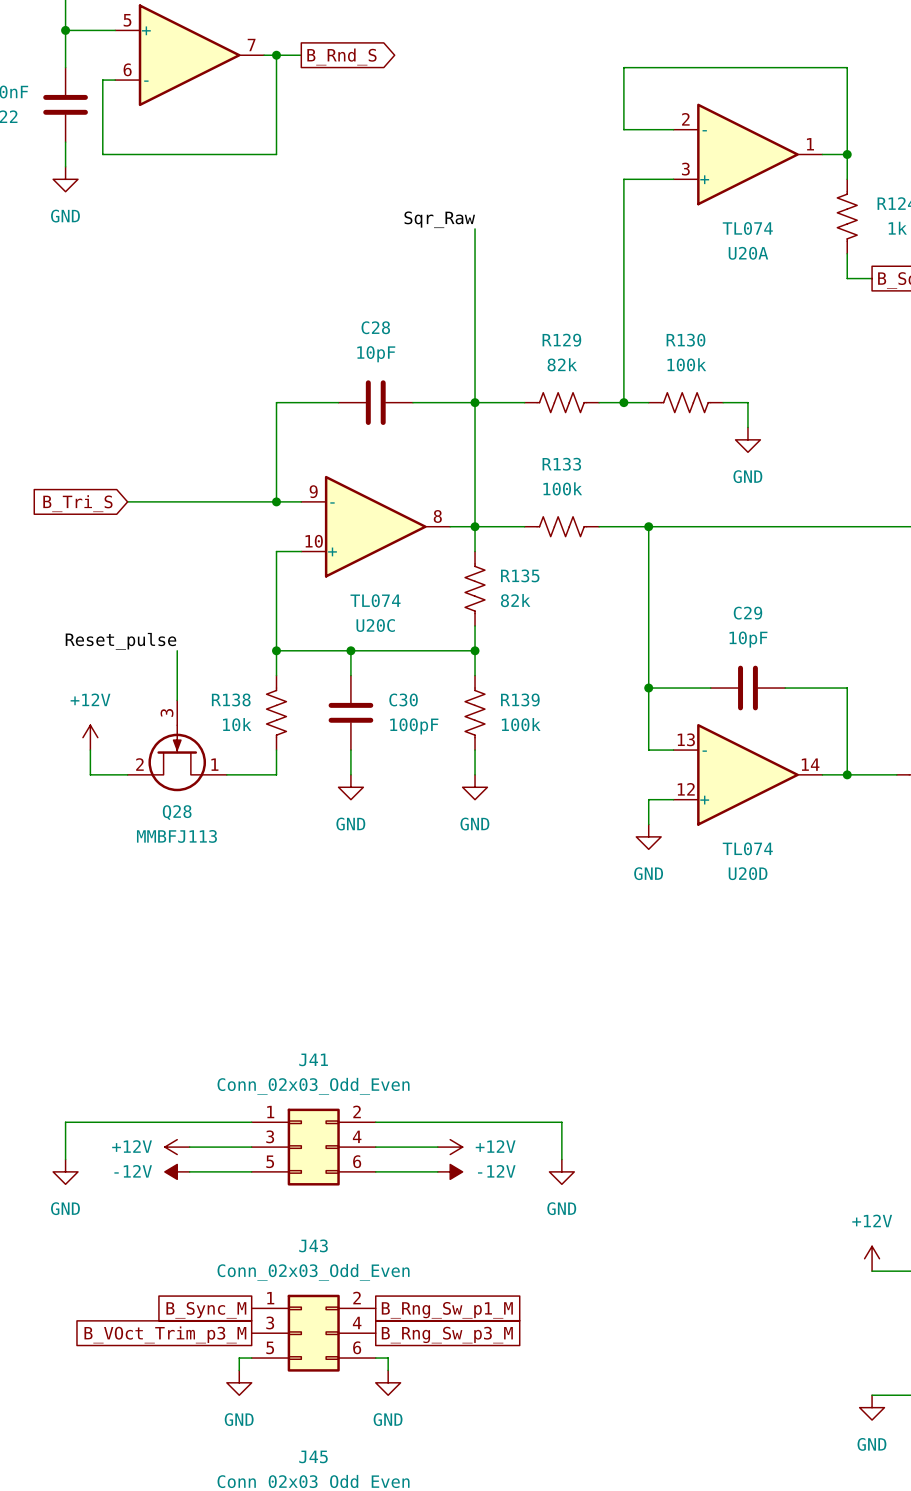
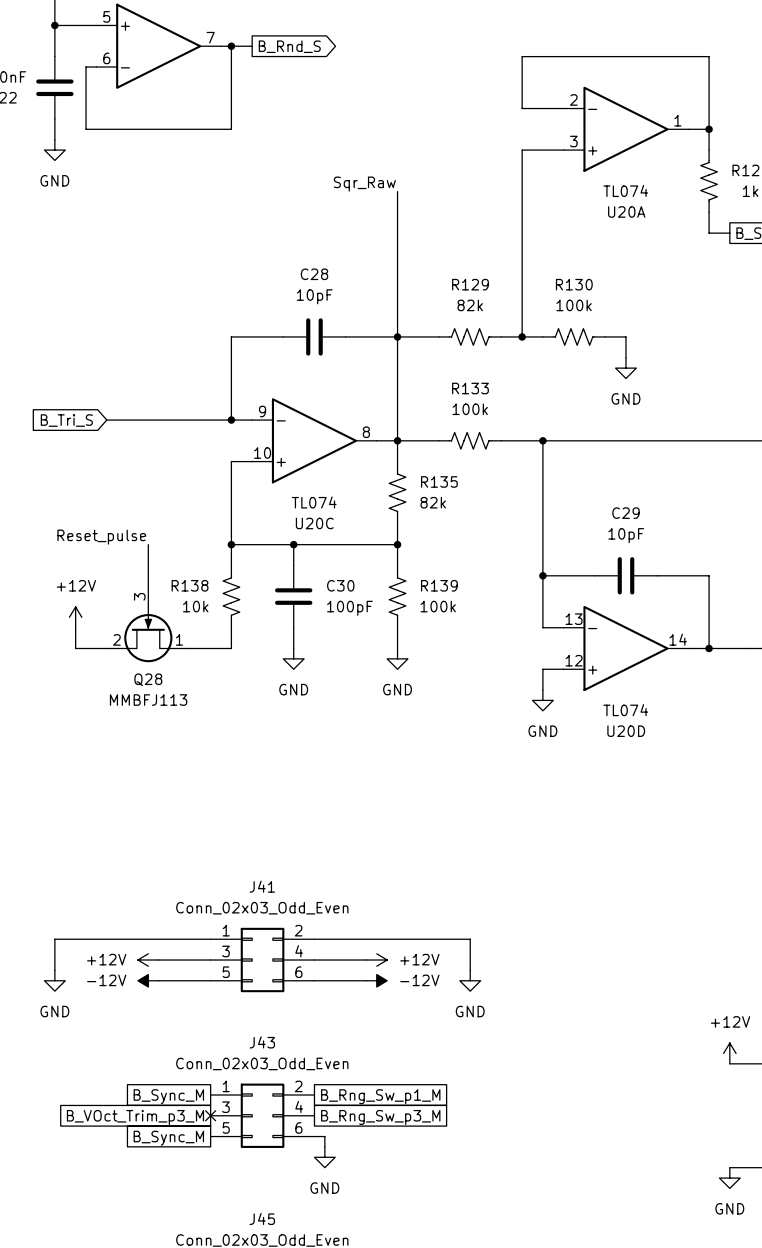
no-connect mark: none -> (210, 1115)
wire: (251, 1358) (239, 1358) (239, 1370) -> none
global label: none -> B_Sync_M (168, 1138)
power symbol: GND (239, 1382) -> none

